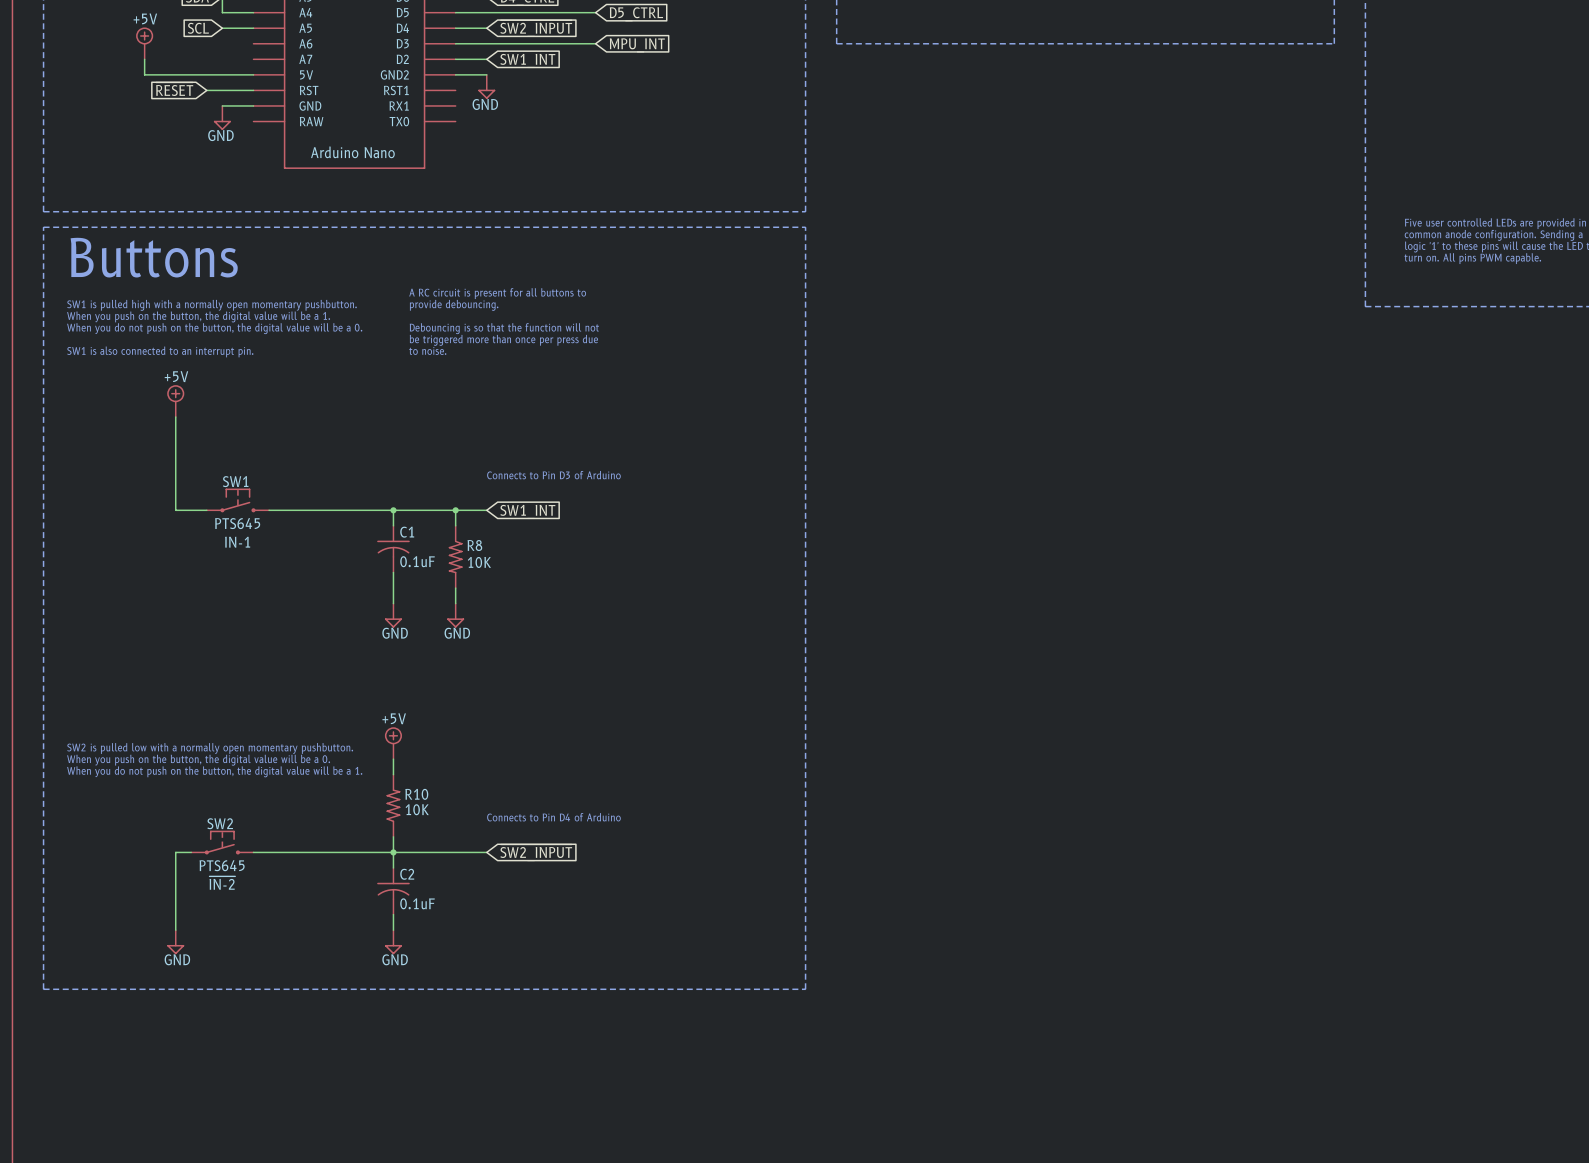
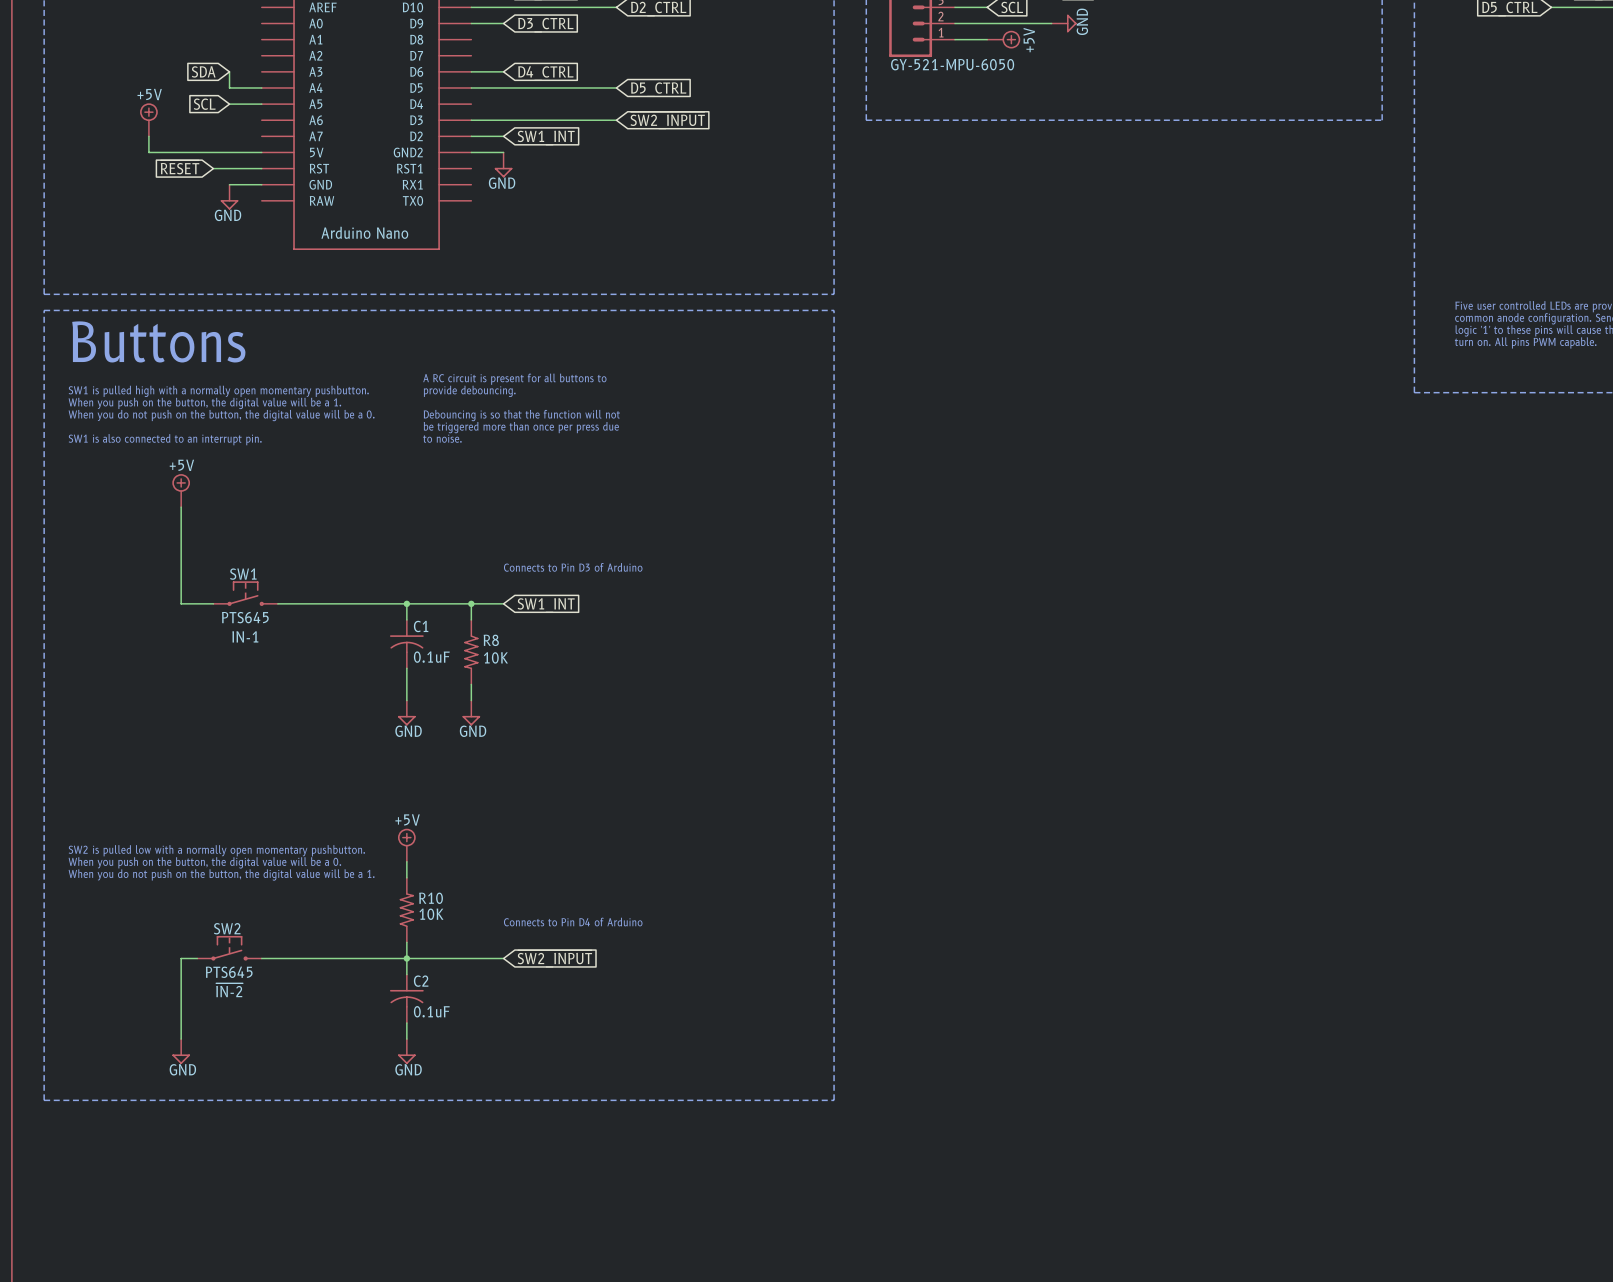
wire: (455, 28) (486, 28) -> none
global label: ~{SW2_INPUT} (536, 28) -> none
global label: MPU_INT (637, 45) -> ~{SW2_INPUT} (667, 120)

